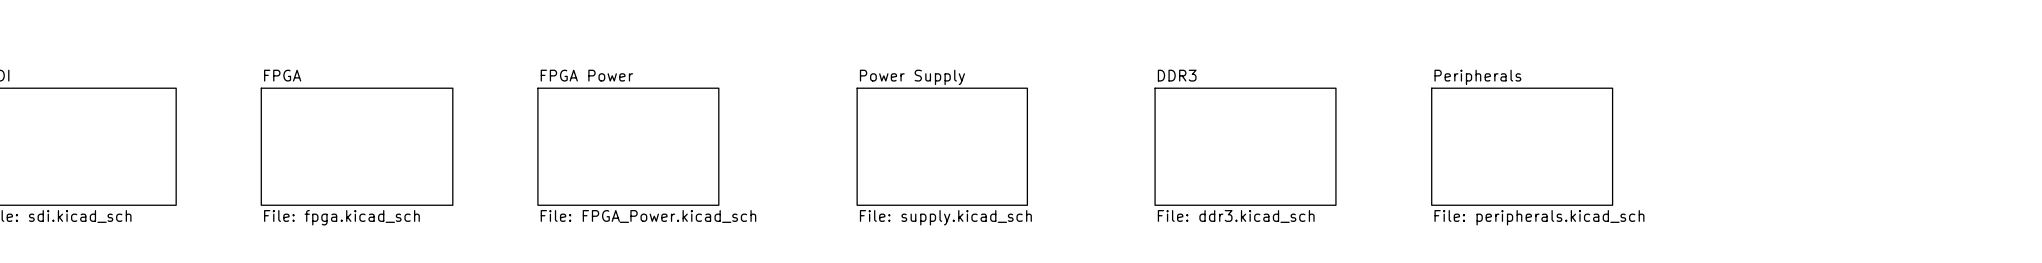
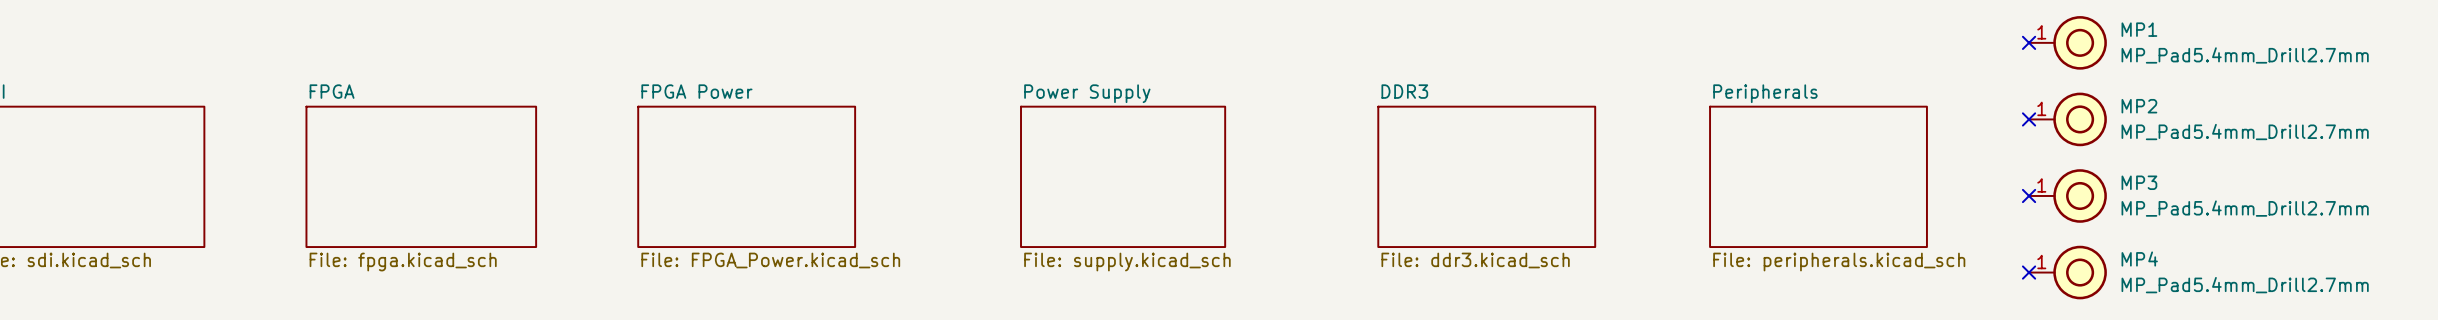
no-connect mark: none -> (2029, 42)
MP1: none -> MP_Pad5.4mm_Drill2.7mm (2067, 42)
no-connect mark: none -> (2029, 119)
MP2: none -> MP_Pad5.4mm_Drill2.7mm (2067, 119)
no-connect mark: none -> (2029, 195)
MP3: none -> MP_Pad5.4mm_Drill2.7mm (2067, 195)
no-connect mark: none -> (2029, 272)
MP4: none -> MP_Pad5.4mm_Drill2.7mm (2067, 272)

